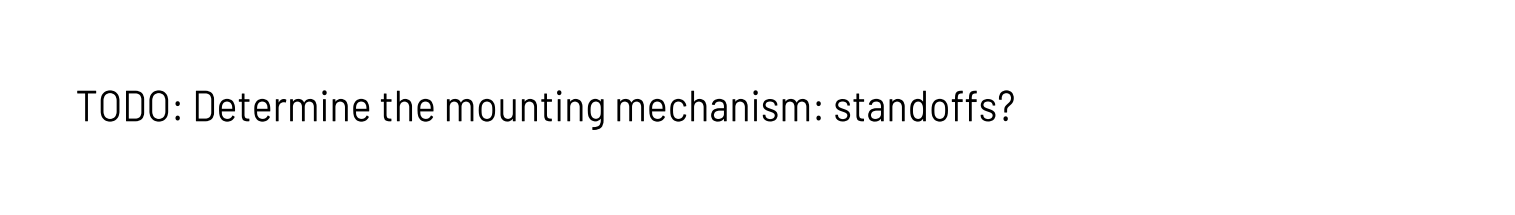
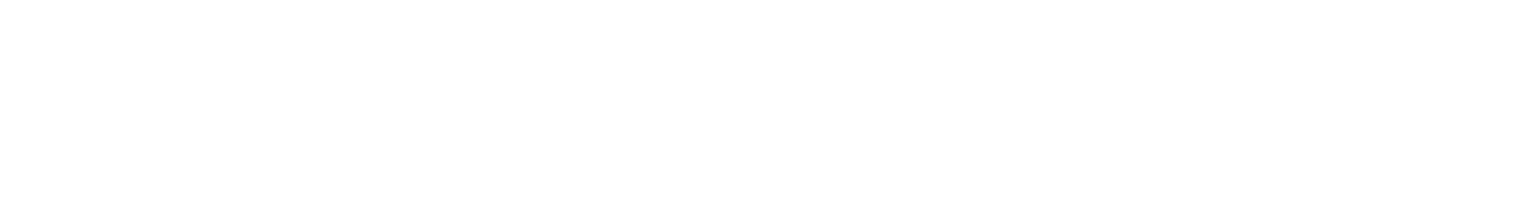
text: TODO: Determine the mounting mechanism: standoffs? (545, 110) -> none

